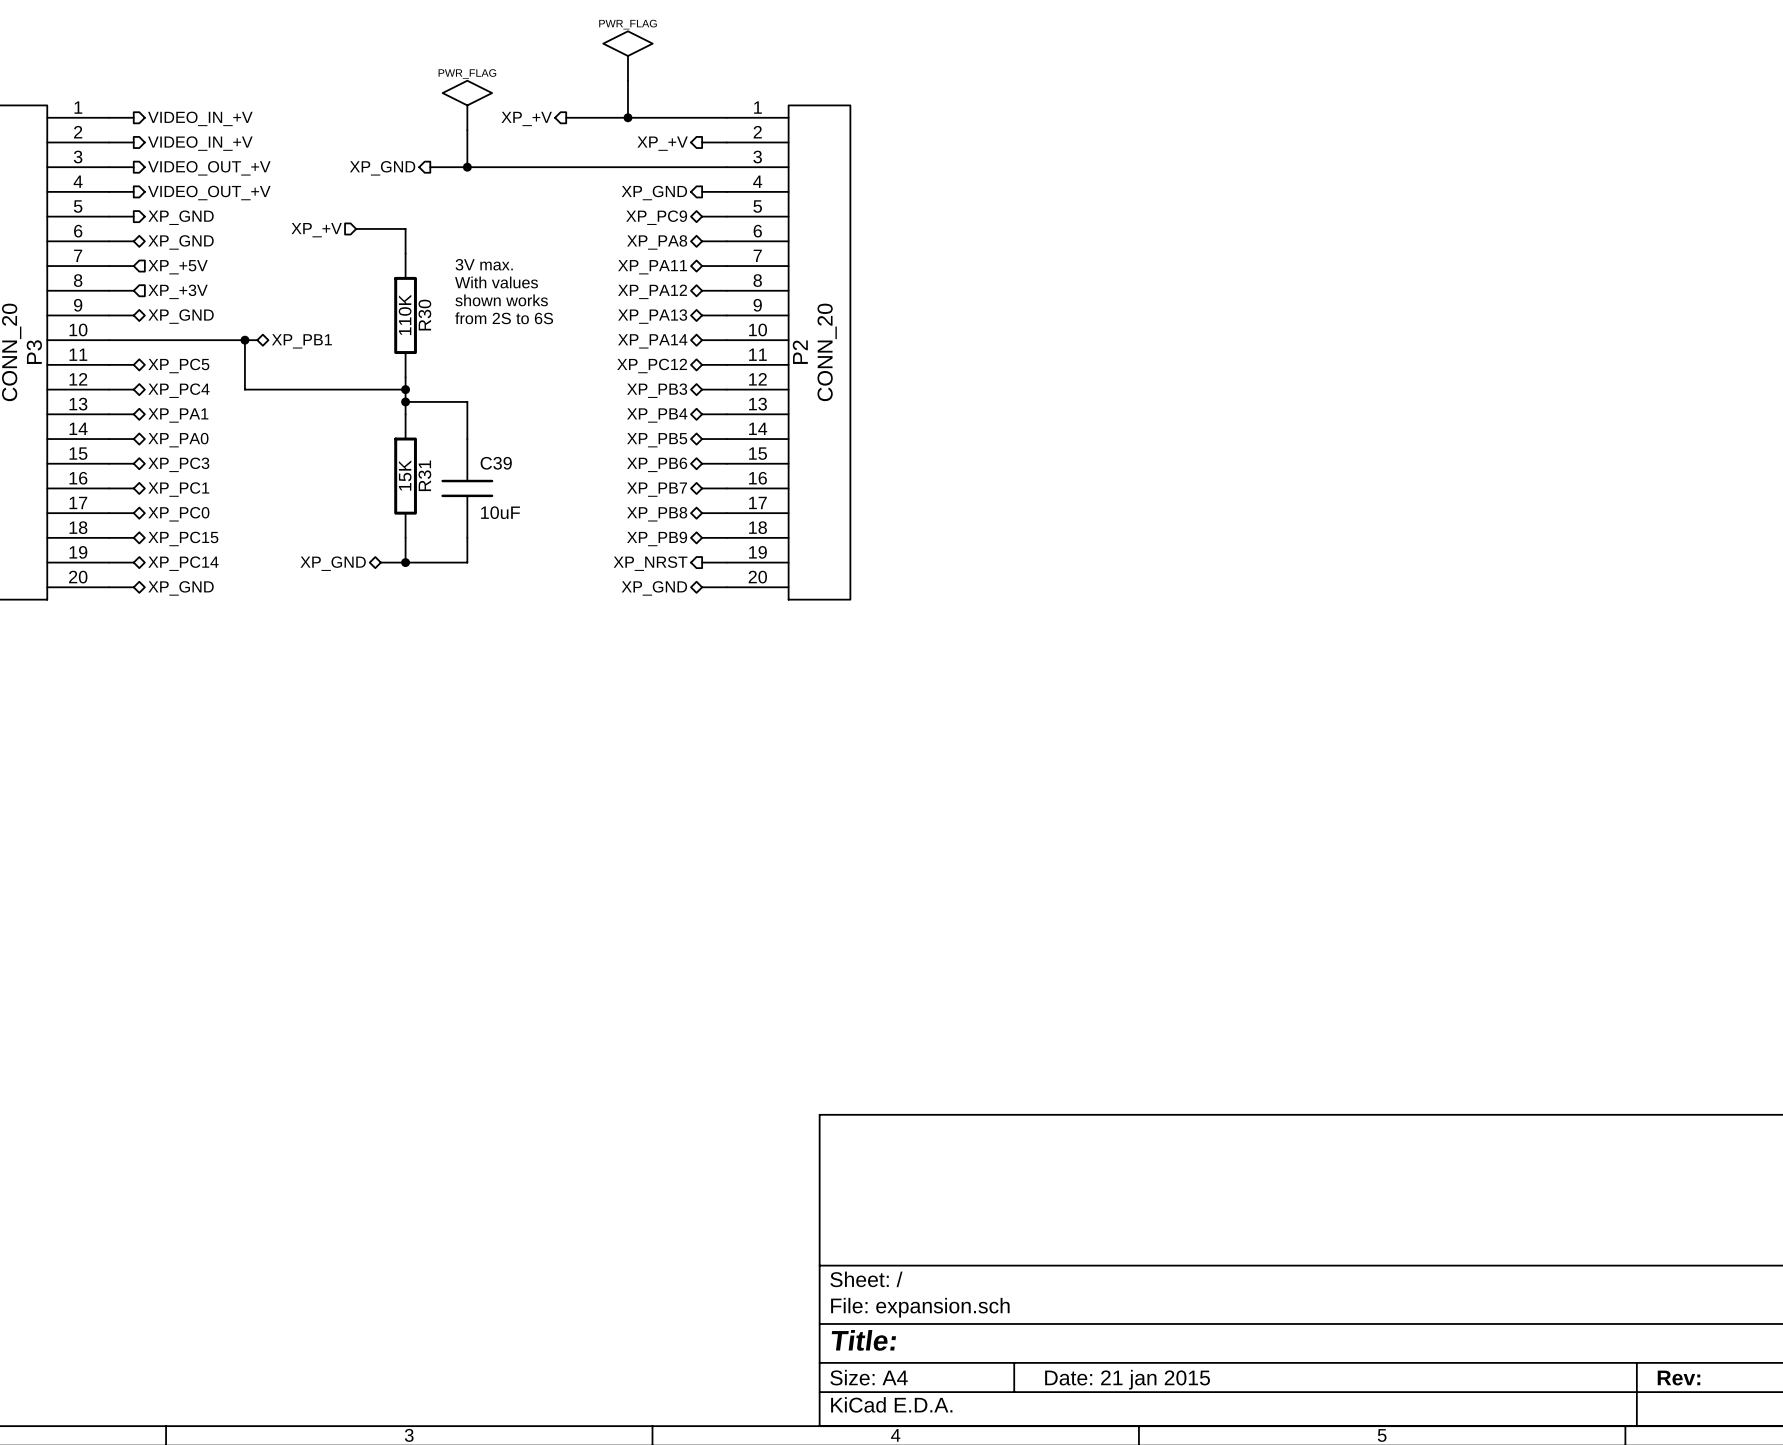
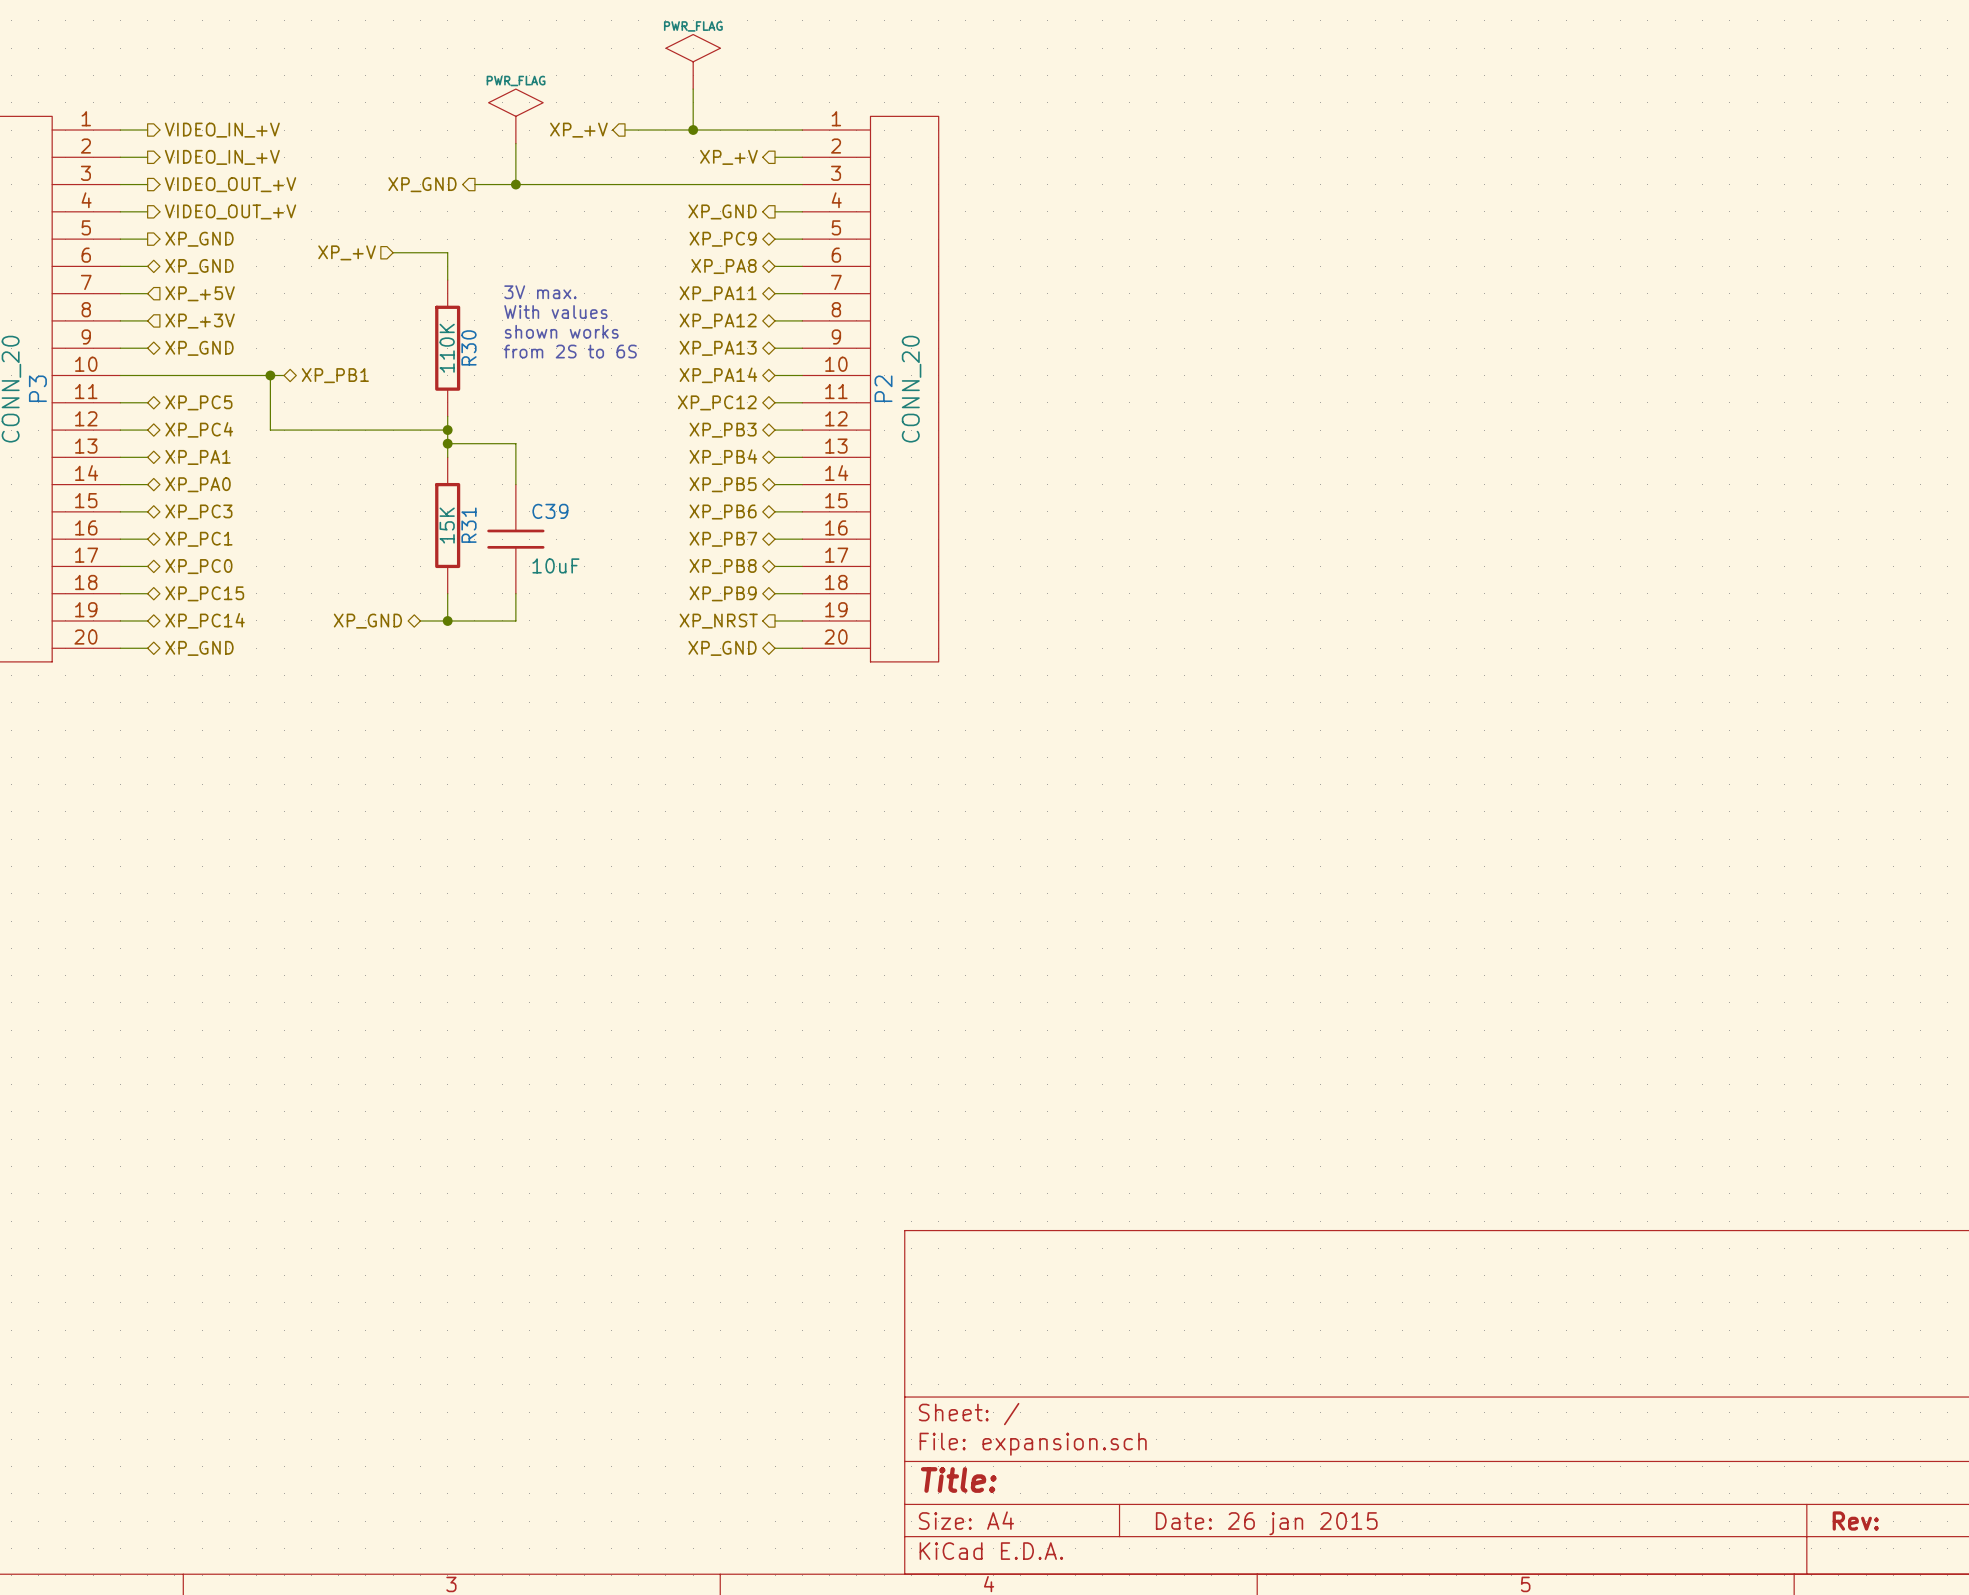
title block: Date: 21 jan 2015 (1127, 1379) -> Date: 26 jan 2015 (1266, 1523)

